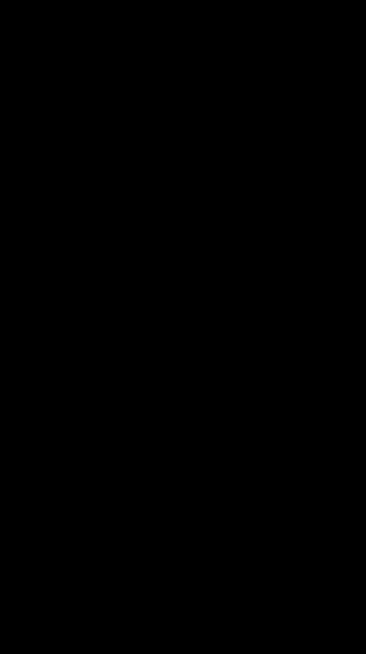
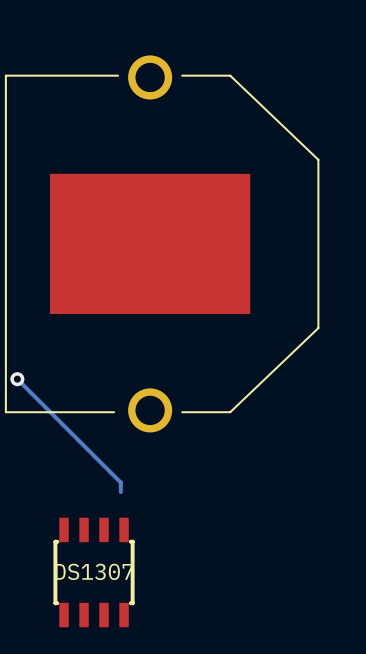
part: none -> (162, 243)
bottom track: none -> (17, 379) (120, 482) (120, 492)
via: none -> (17, 379)
part: none -> DS1307 (94, 572)

